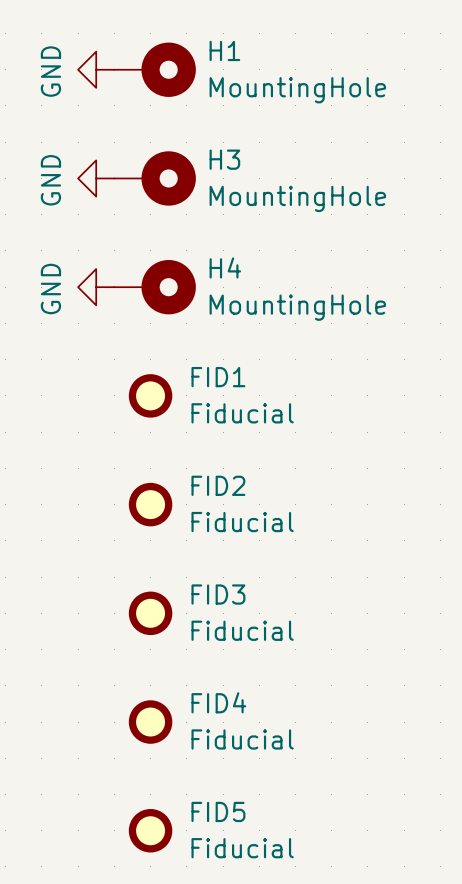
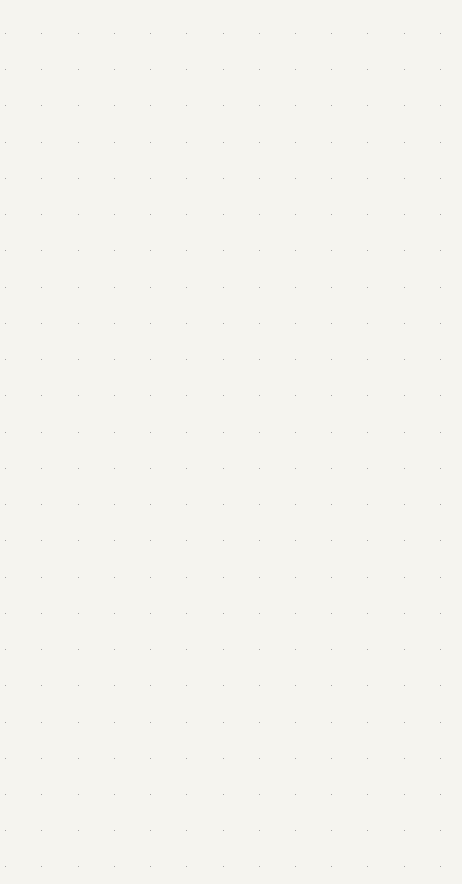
power symbol: GND (96, 69) -> none
H1: MountingHole (155, 69) -> none
power symbol: GND (96, 178) -> none
H3: MountingHole (155, 178) -> none
power symbol: GND (96, 287) -> none
H4: MountingHole (155, 287) -> none
FID1: Fiducial (150, 395) -> none
FID2: Fiducial (150, 504) -> none
FID3: Fiducial (150, 613) -> none
FID4: Fiducial (150, 722) -> none
FID5: Fiducial (150, 830) -> none

